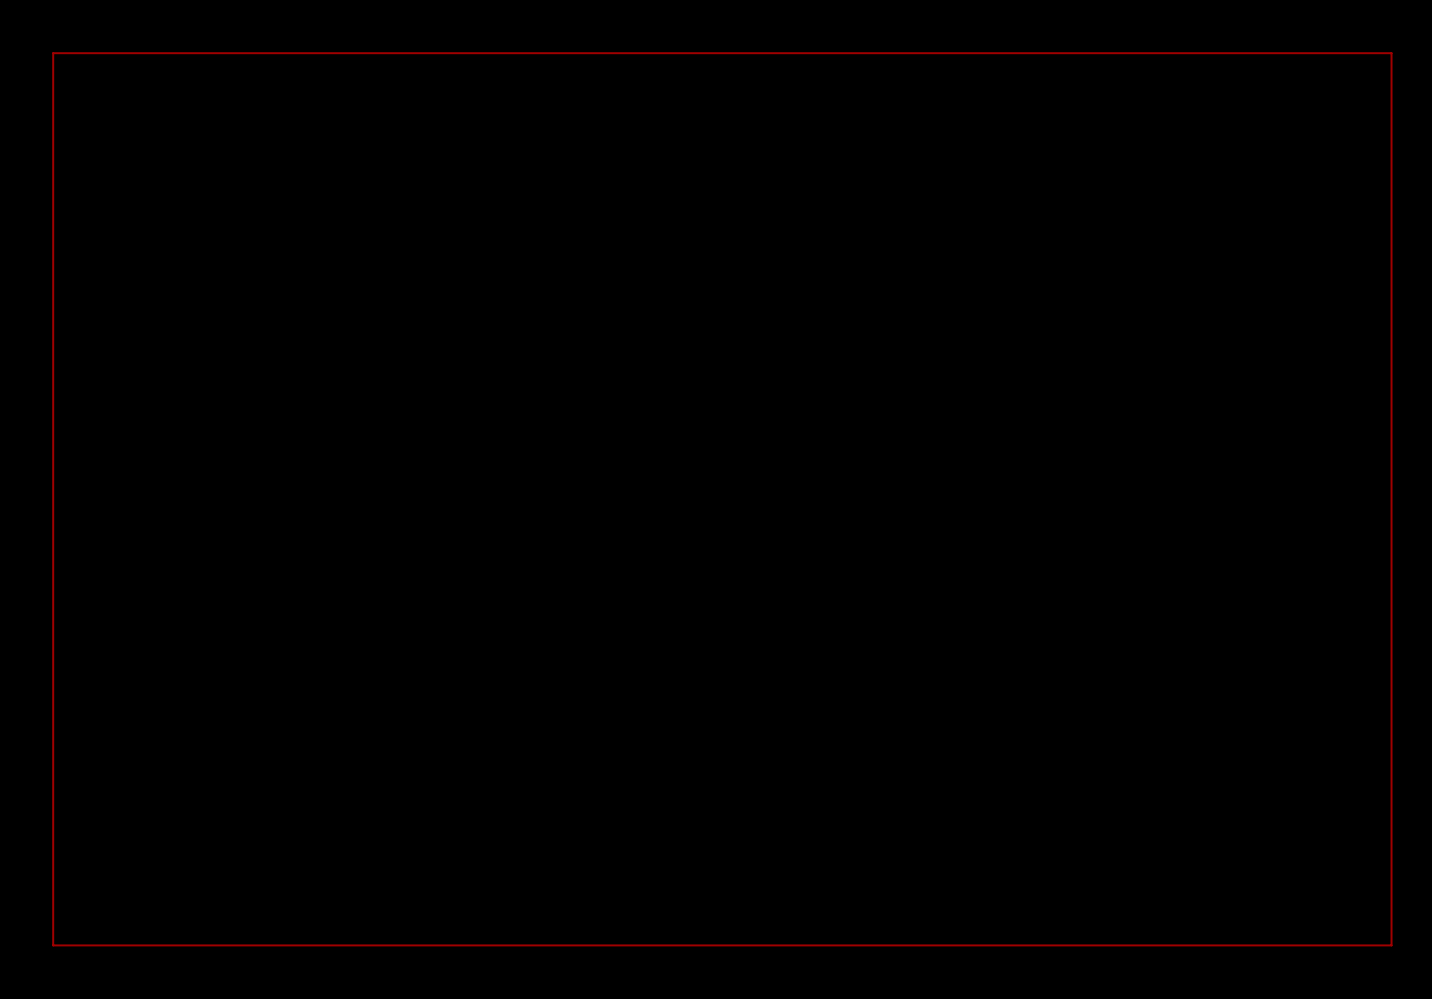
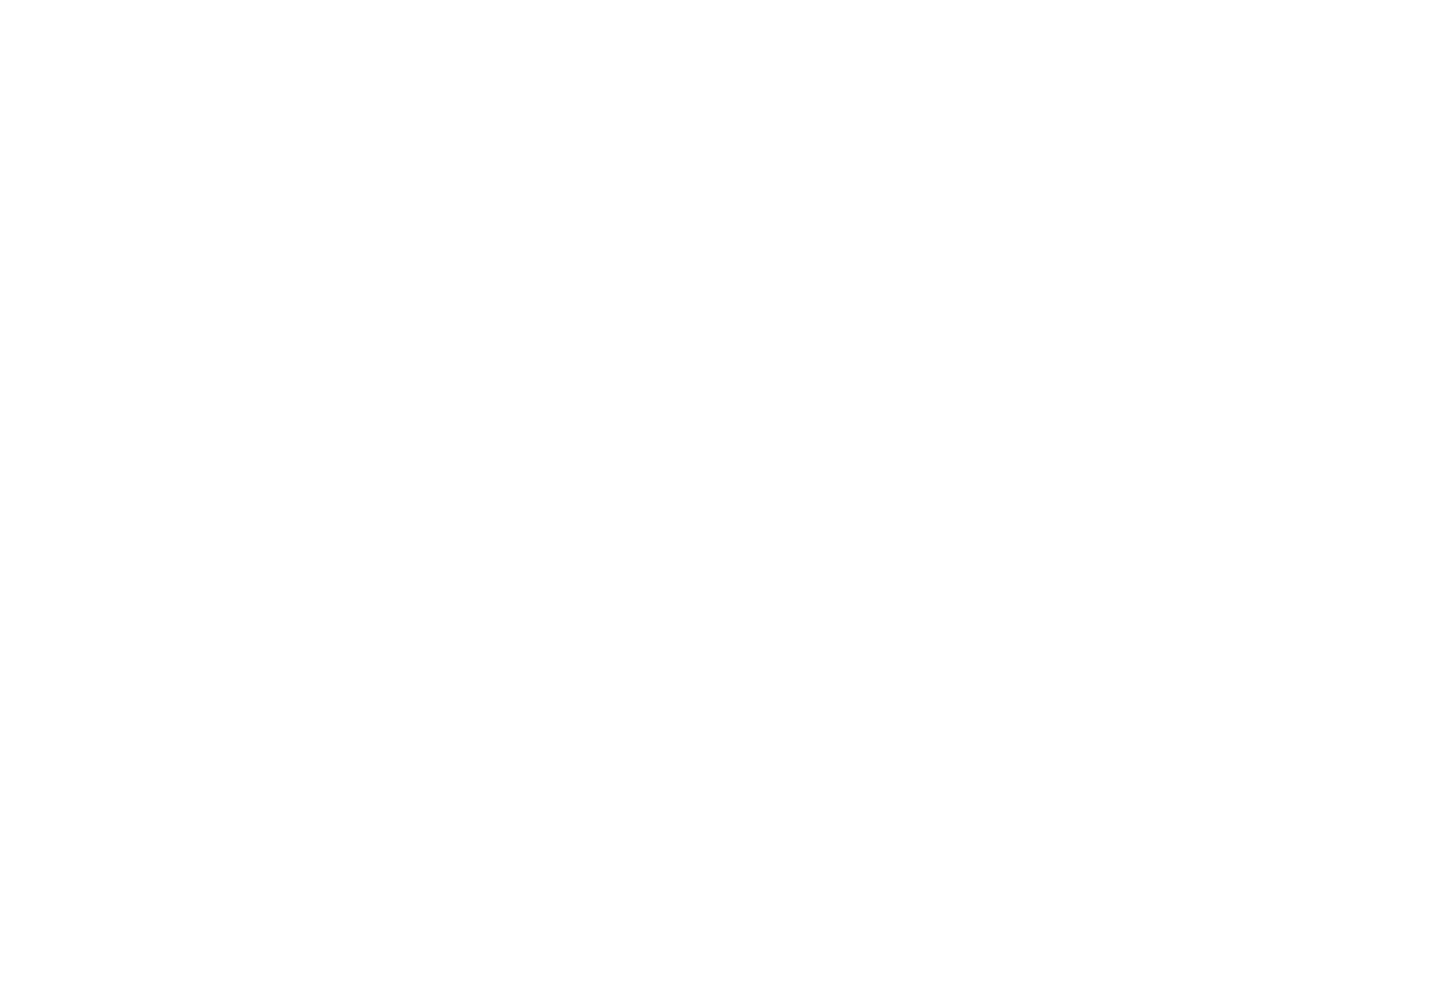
top track: (53, 53) (1391, 53) (1391, 945) (53, 945) (53, 53) -> none

